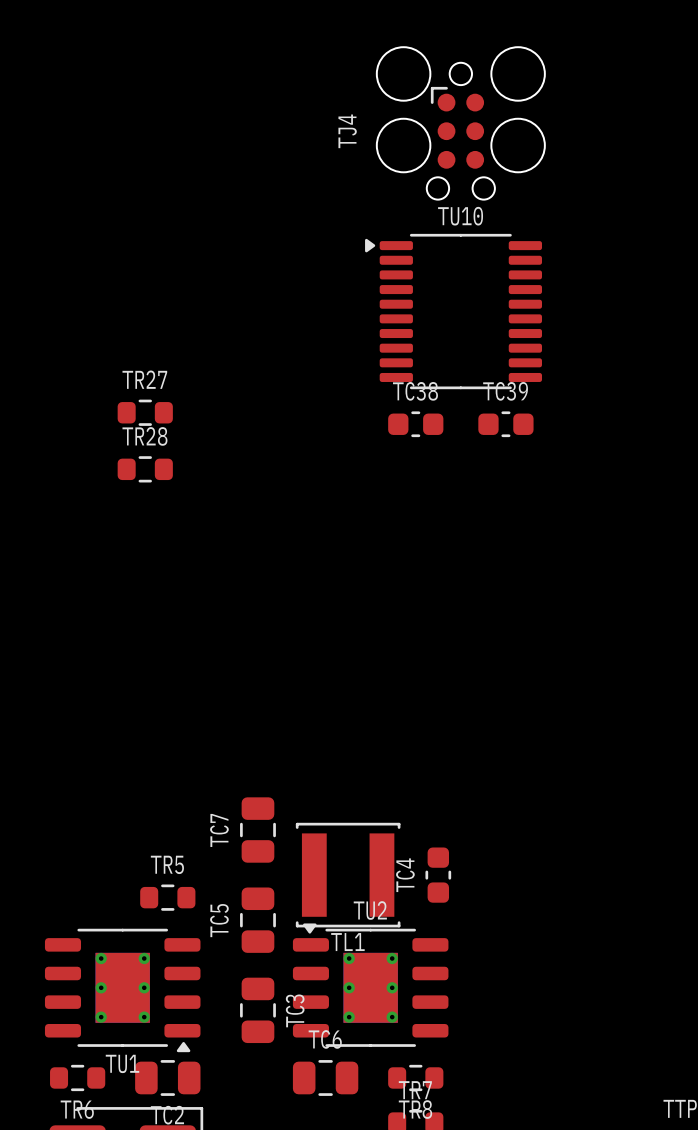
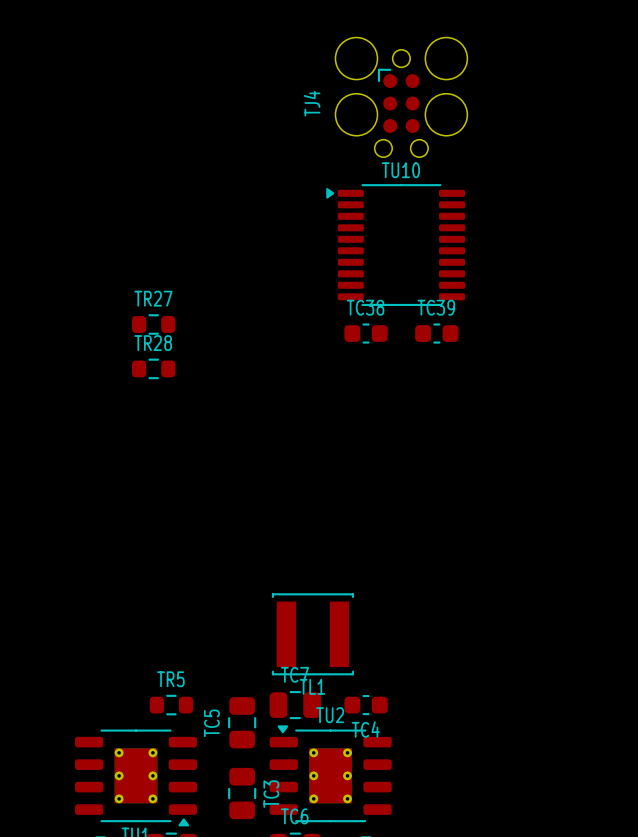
TC7 rotation: 0° (257, 830) -> 90° clockwise (295, 705)
TC7 position: (257, 830) -> (295, 705)
TL1 position: (348, 875) -> (312, 634)
TC4 name position: TC4 (405, 875) -> TC4 (365, 729)
TC4 rotation: 0° (438, 875) -> 90° clockwise (366, 705)

